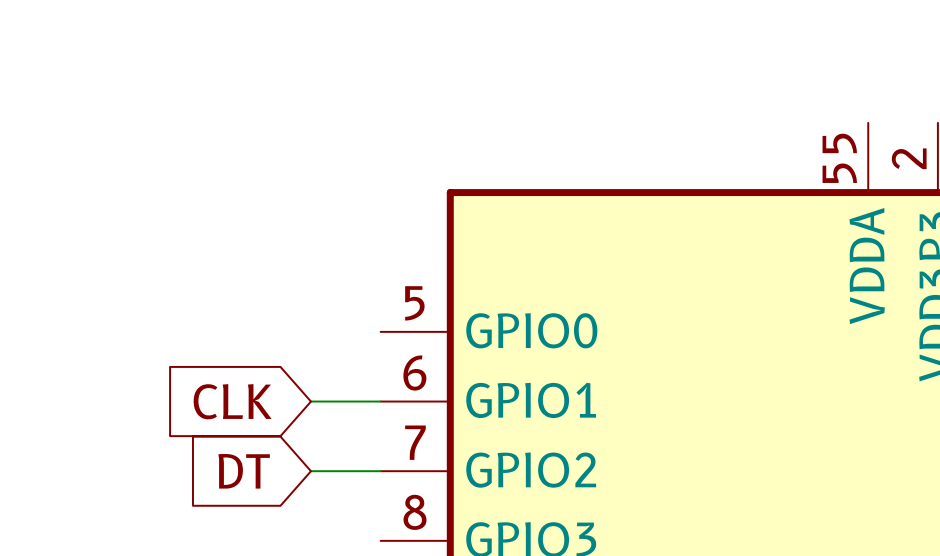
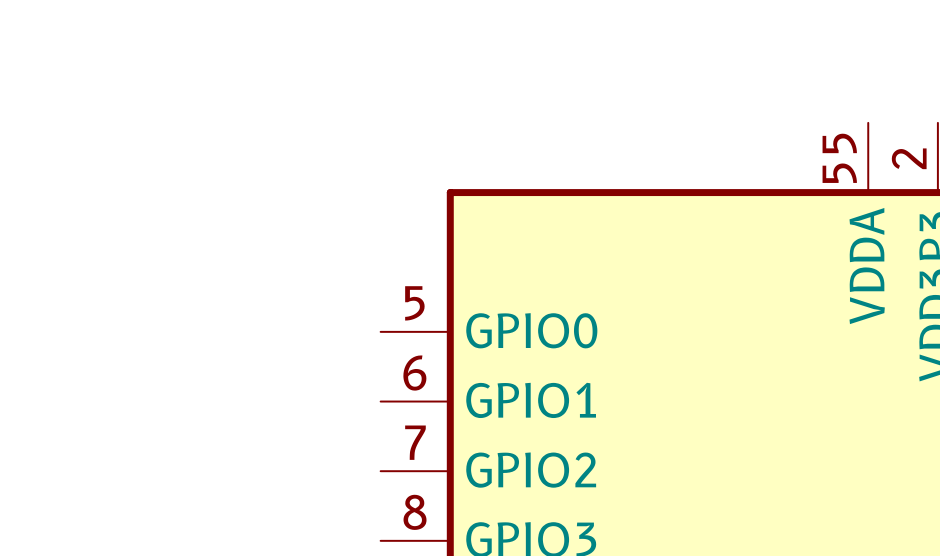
global label: CLK (232, 401) -> none
wire: (310, 401) (380, 401) -> none
global label: DT (244, 471) -> none
wire: (310, 471) (380, 471) -> none

